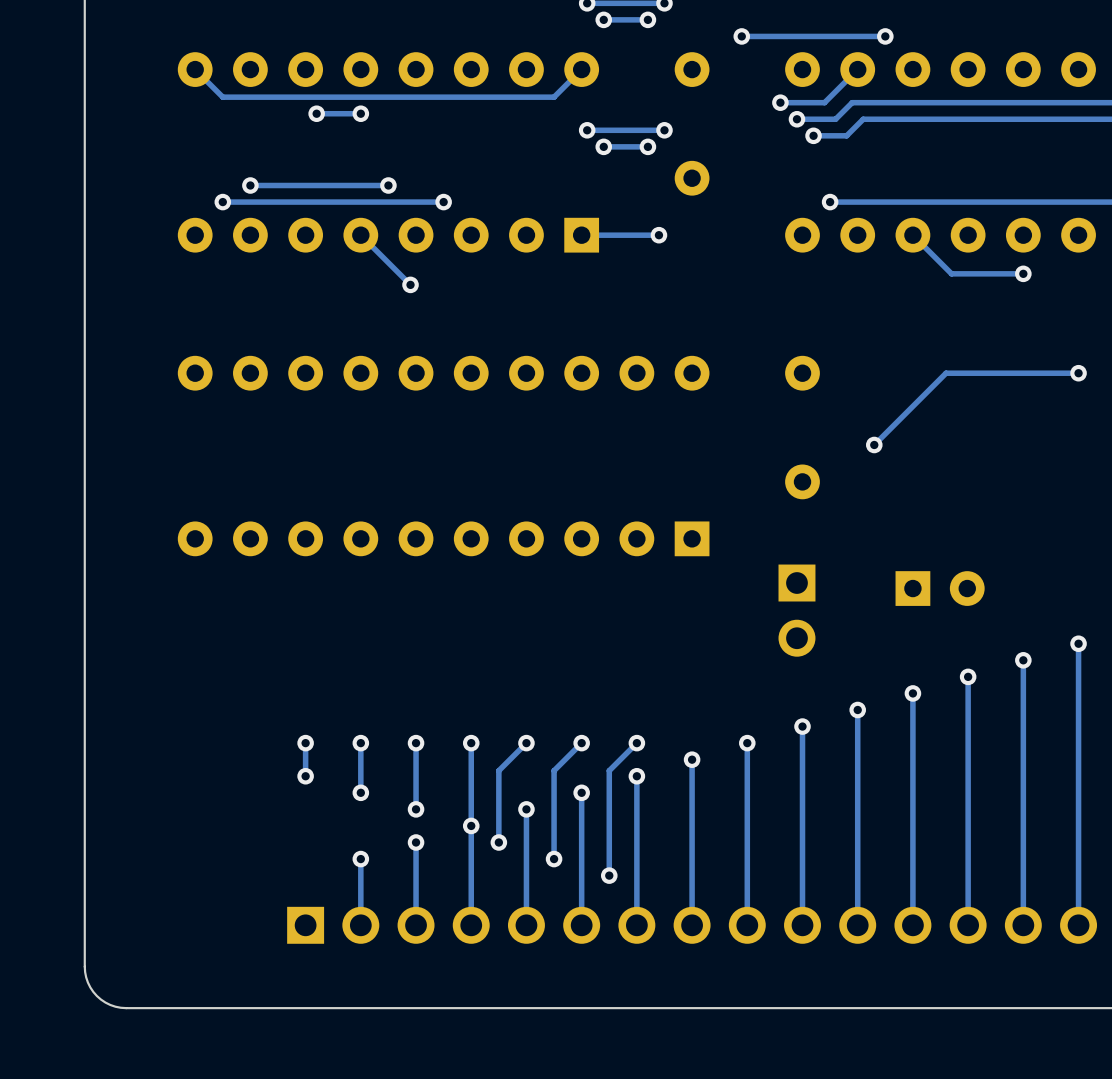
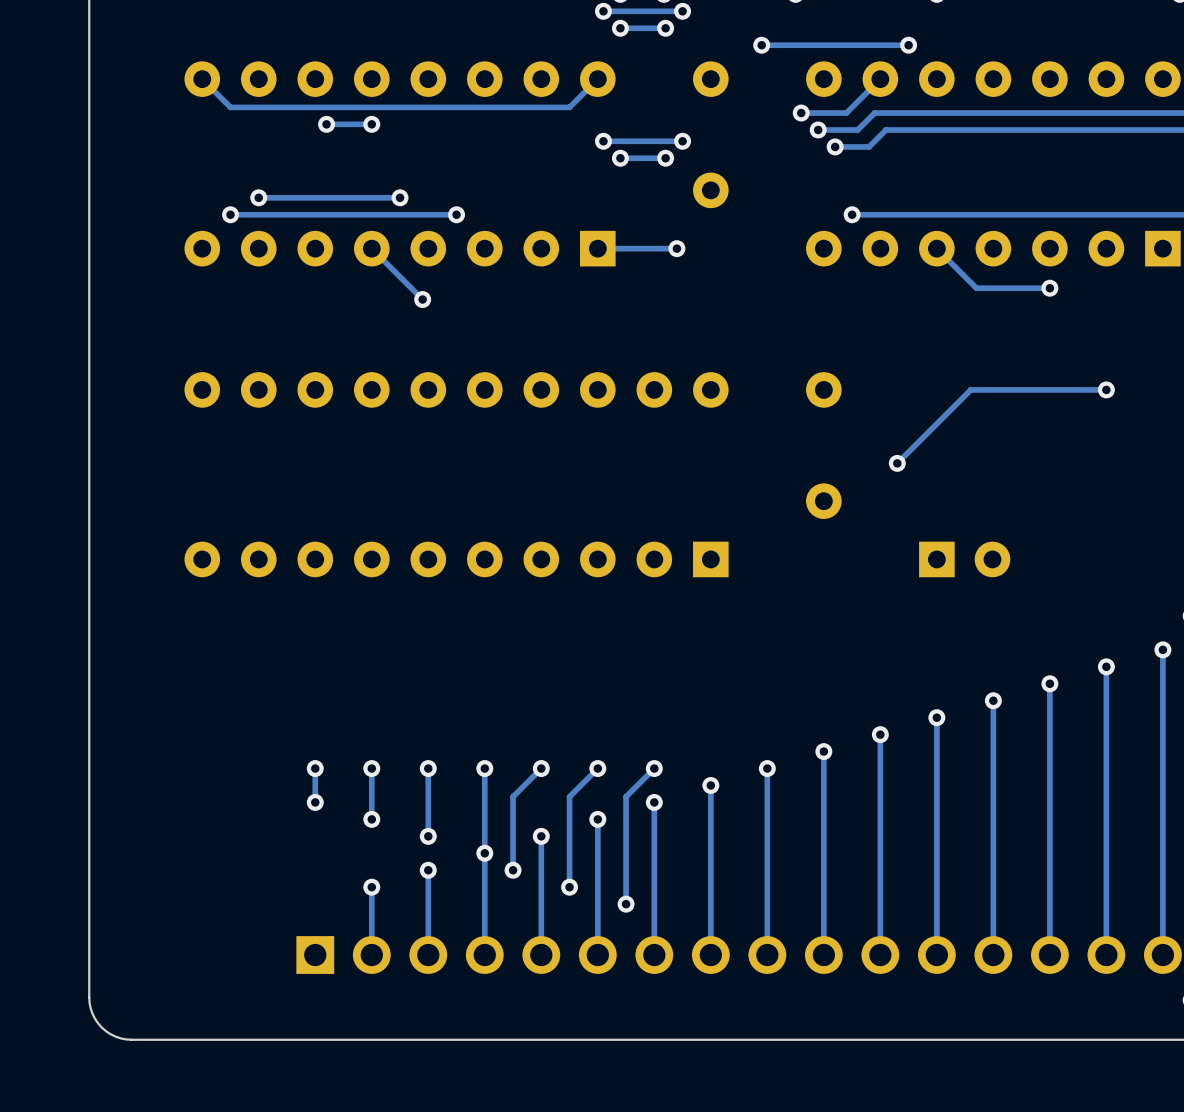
part position: (940, 588) -> (964, 559)
part: (796, 610) -> none

